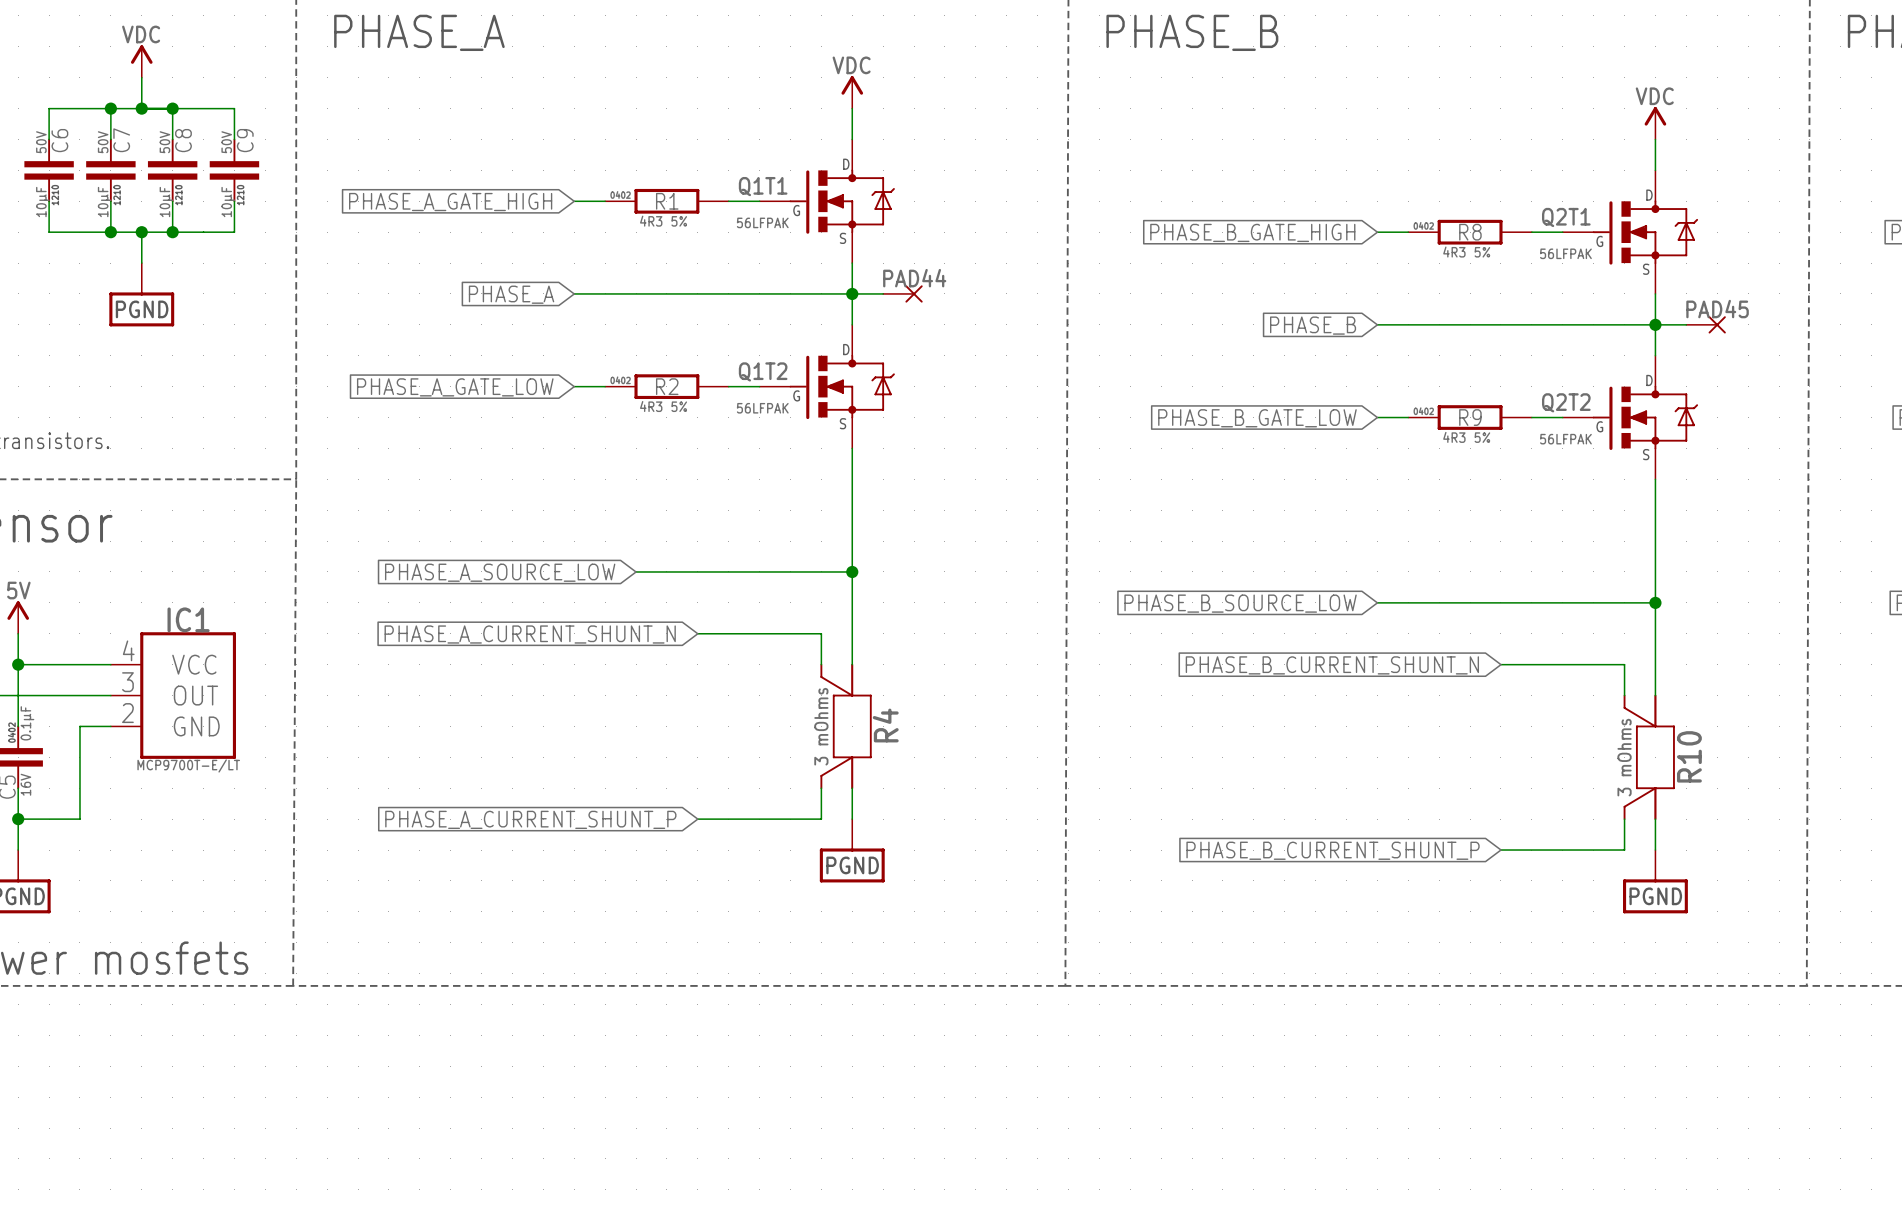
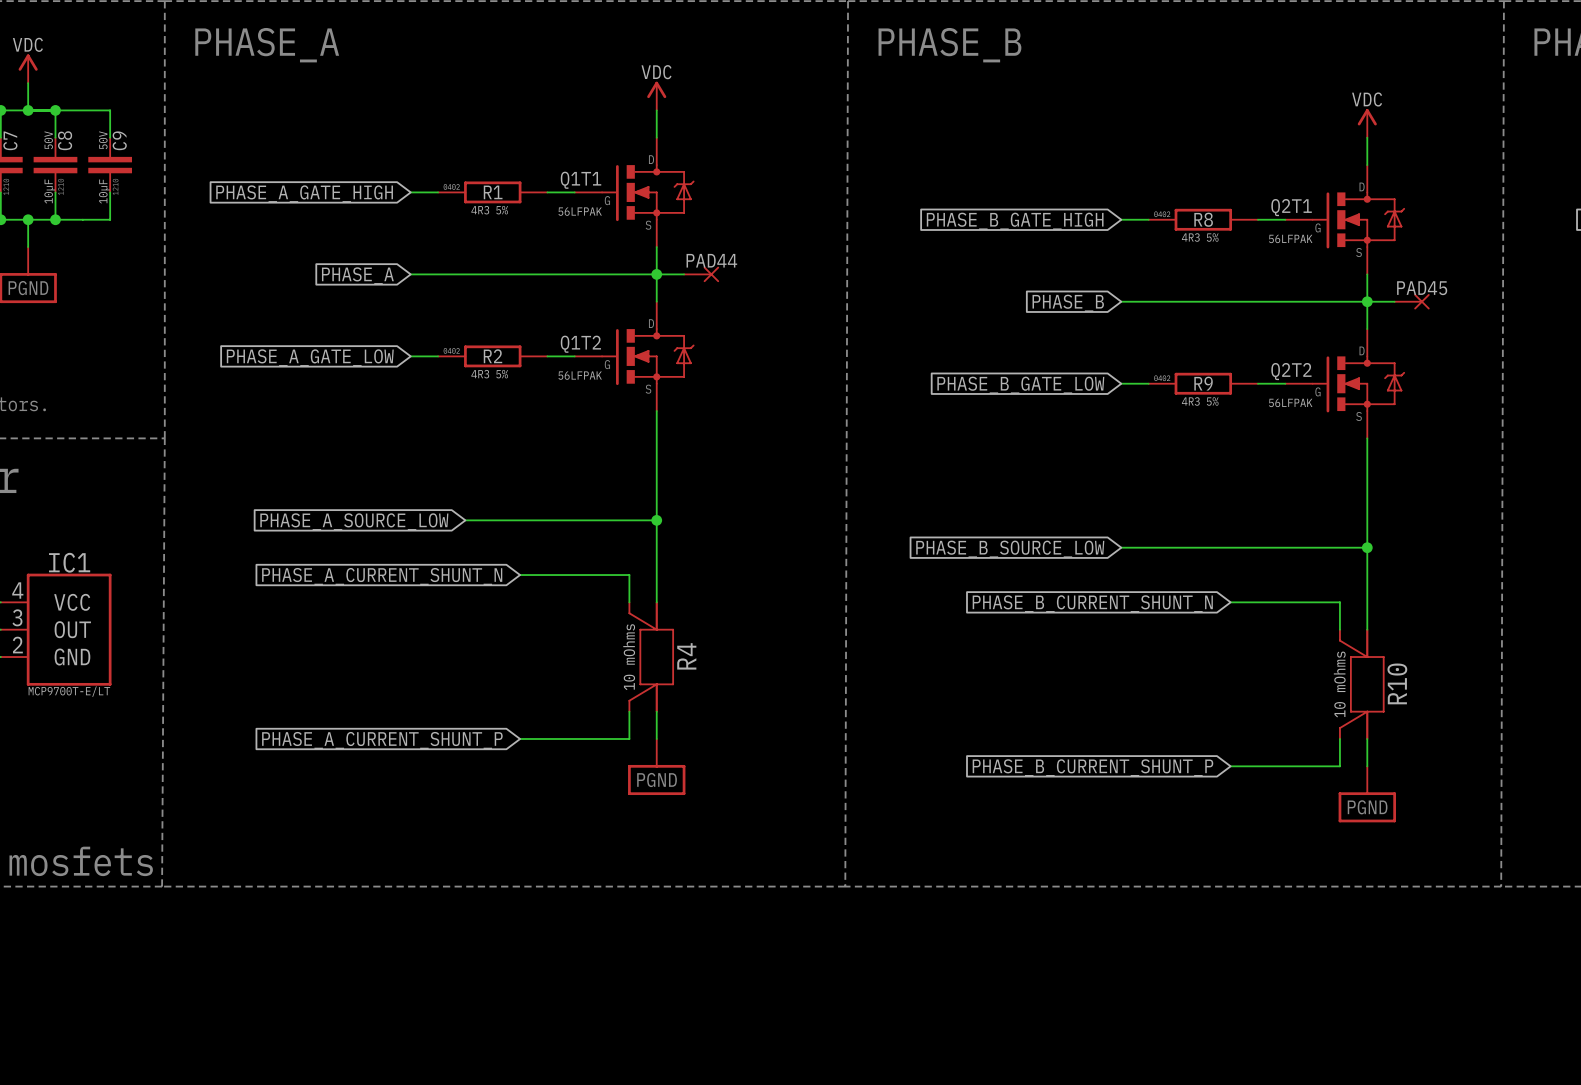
R4 value: 3 mOhms (821, 726) -> 10 mOhms (629, 657)
R10 value: 3 mOhms (1624, 757) -> 10 mOhms (1339, 684)

